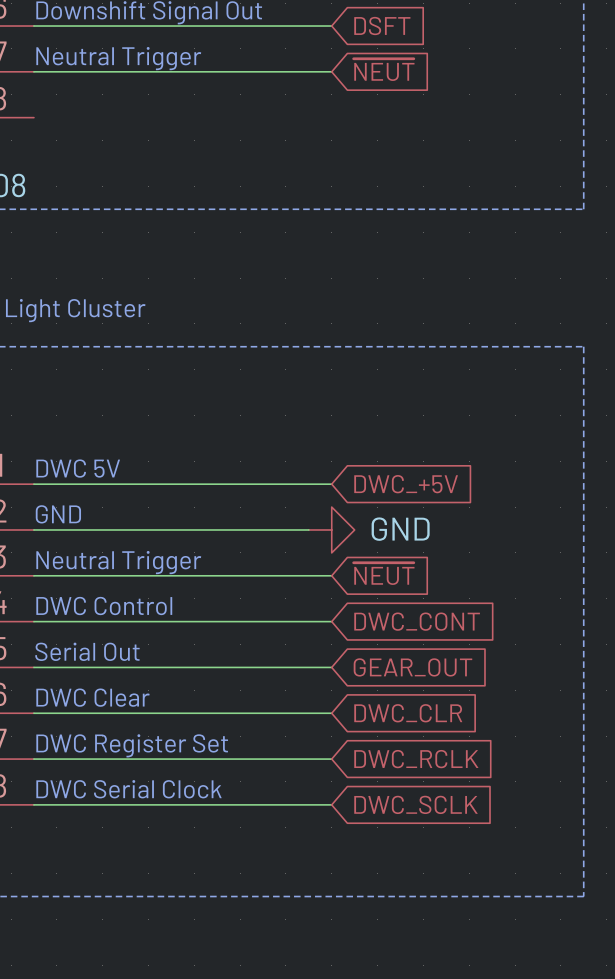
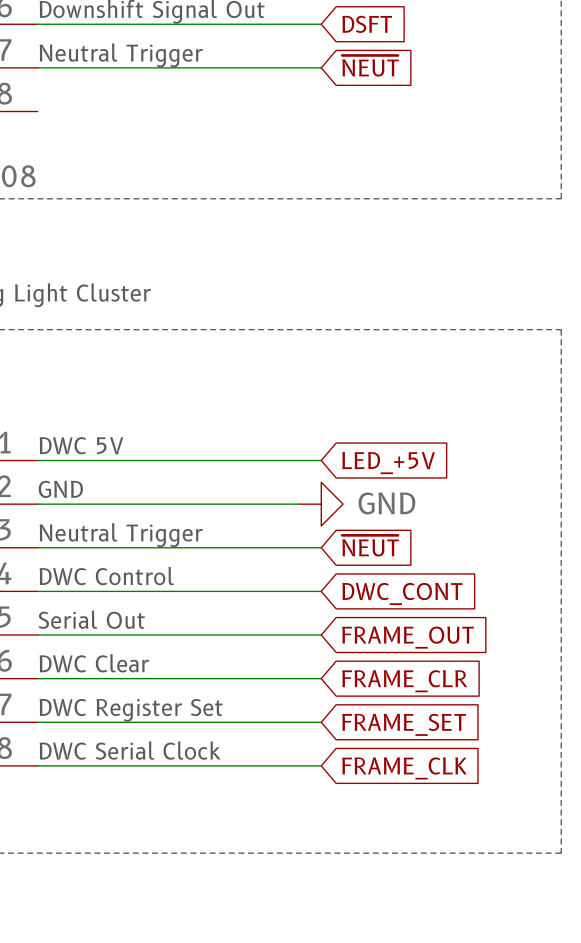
global label: DWC_+5V (406, 484) -> LED_+5V (388, 463)
global label: GEAR_OUT (412, 667) -> FRAME_OUT (408, 637)
global label: DWC_CLR (408, 713) -> FRAME_CLR (404, 681)
global label: DWC_RCLK (416, 759) -> FRAME_SET (404, 724)
global label: DWC_SCLK (415, 804) -> FRAME_CLK (404, 768)

